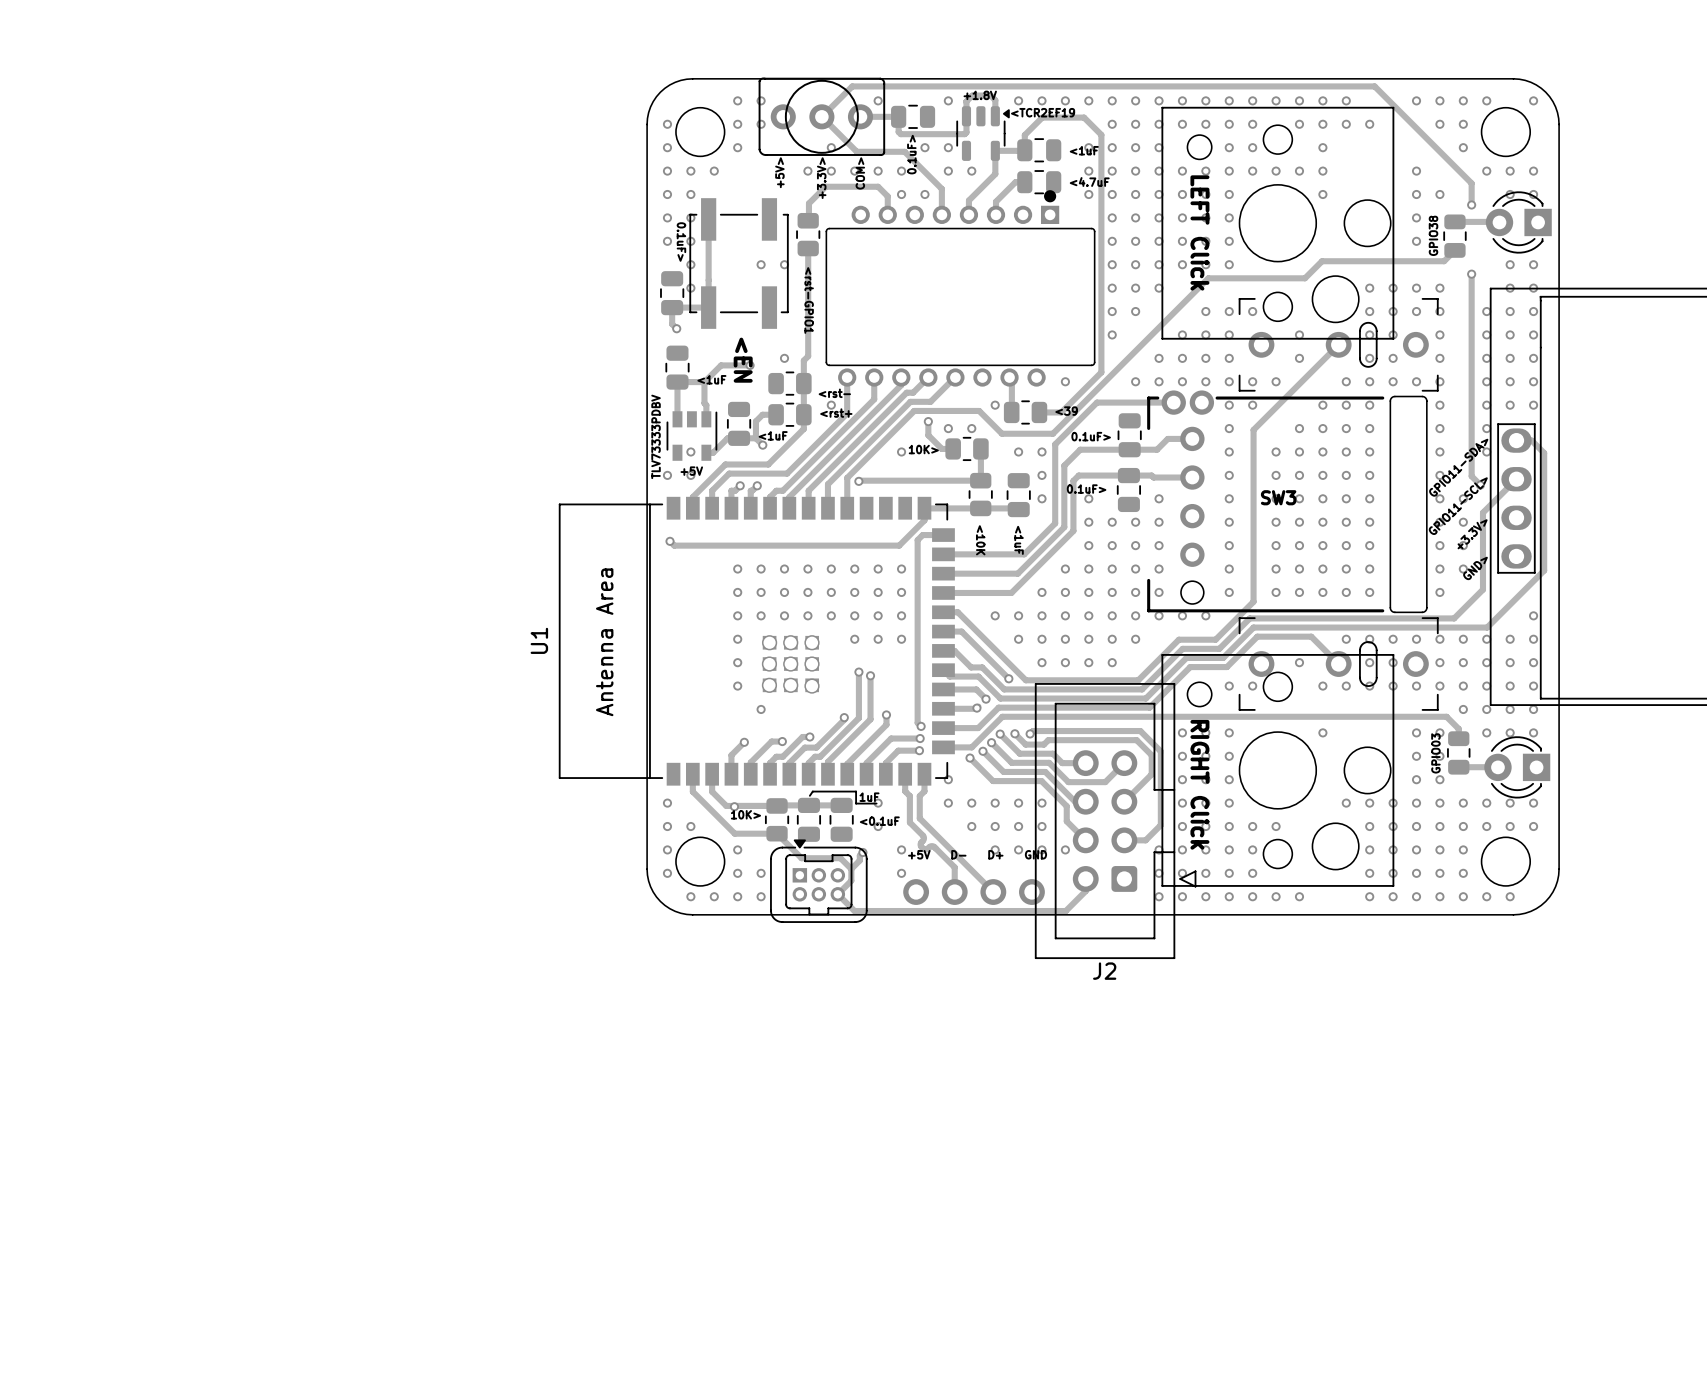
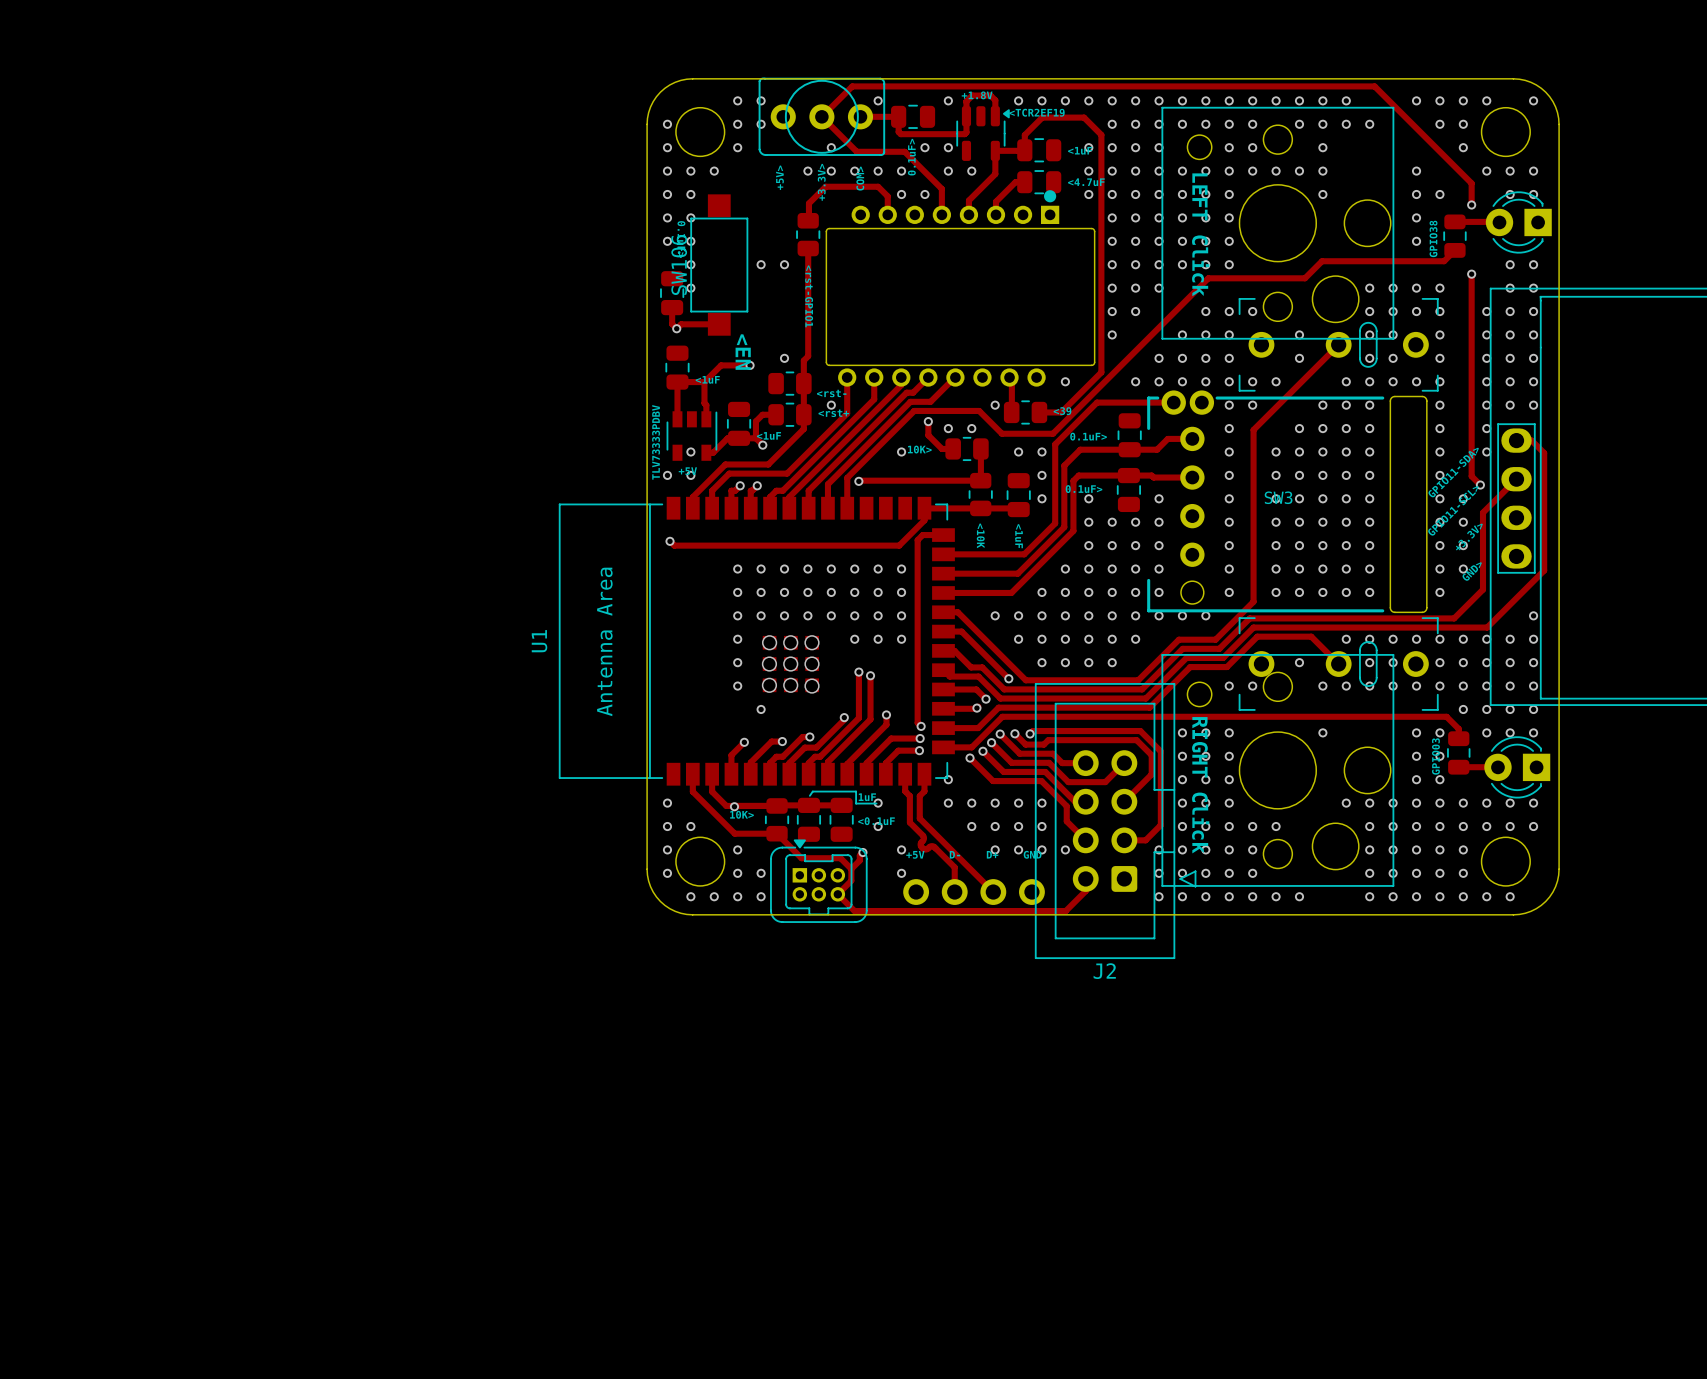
track: (708, 219) (708, 307) (672, 307) -> none
part: (739, 263) -> none
SW106: none -> (719, 265)
track: none -> (719, 324) (681, 324) (676, 328)

